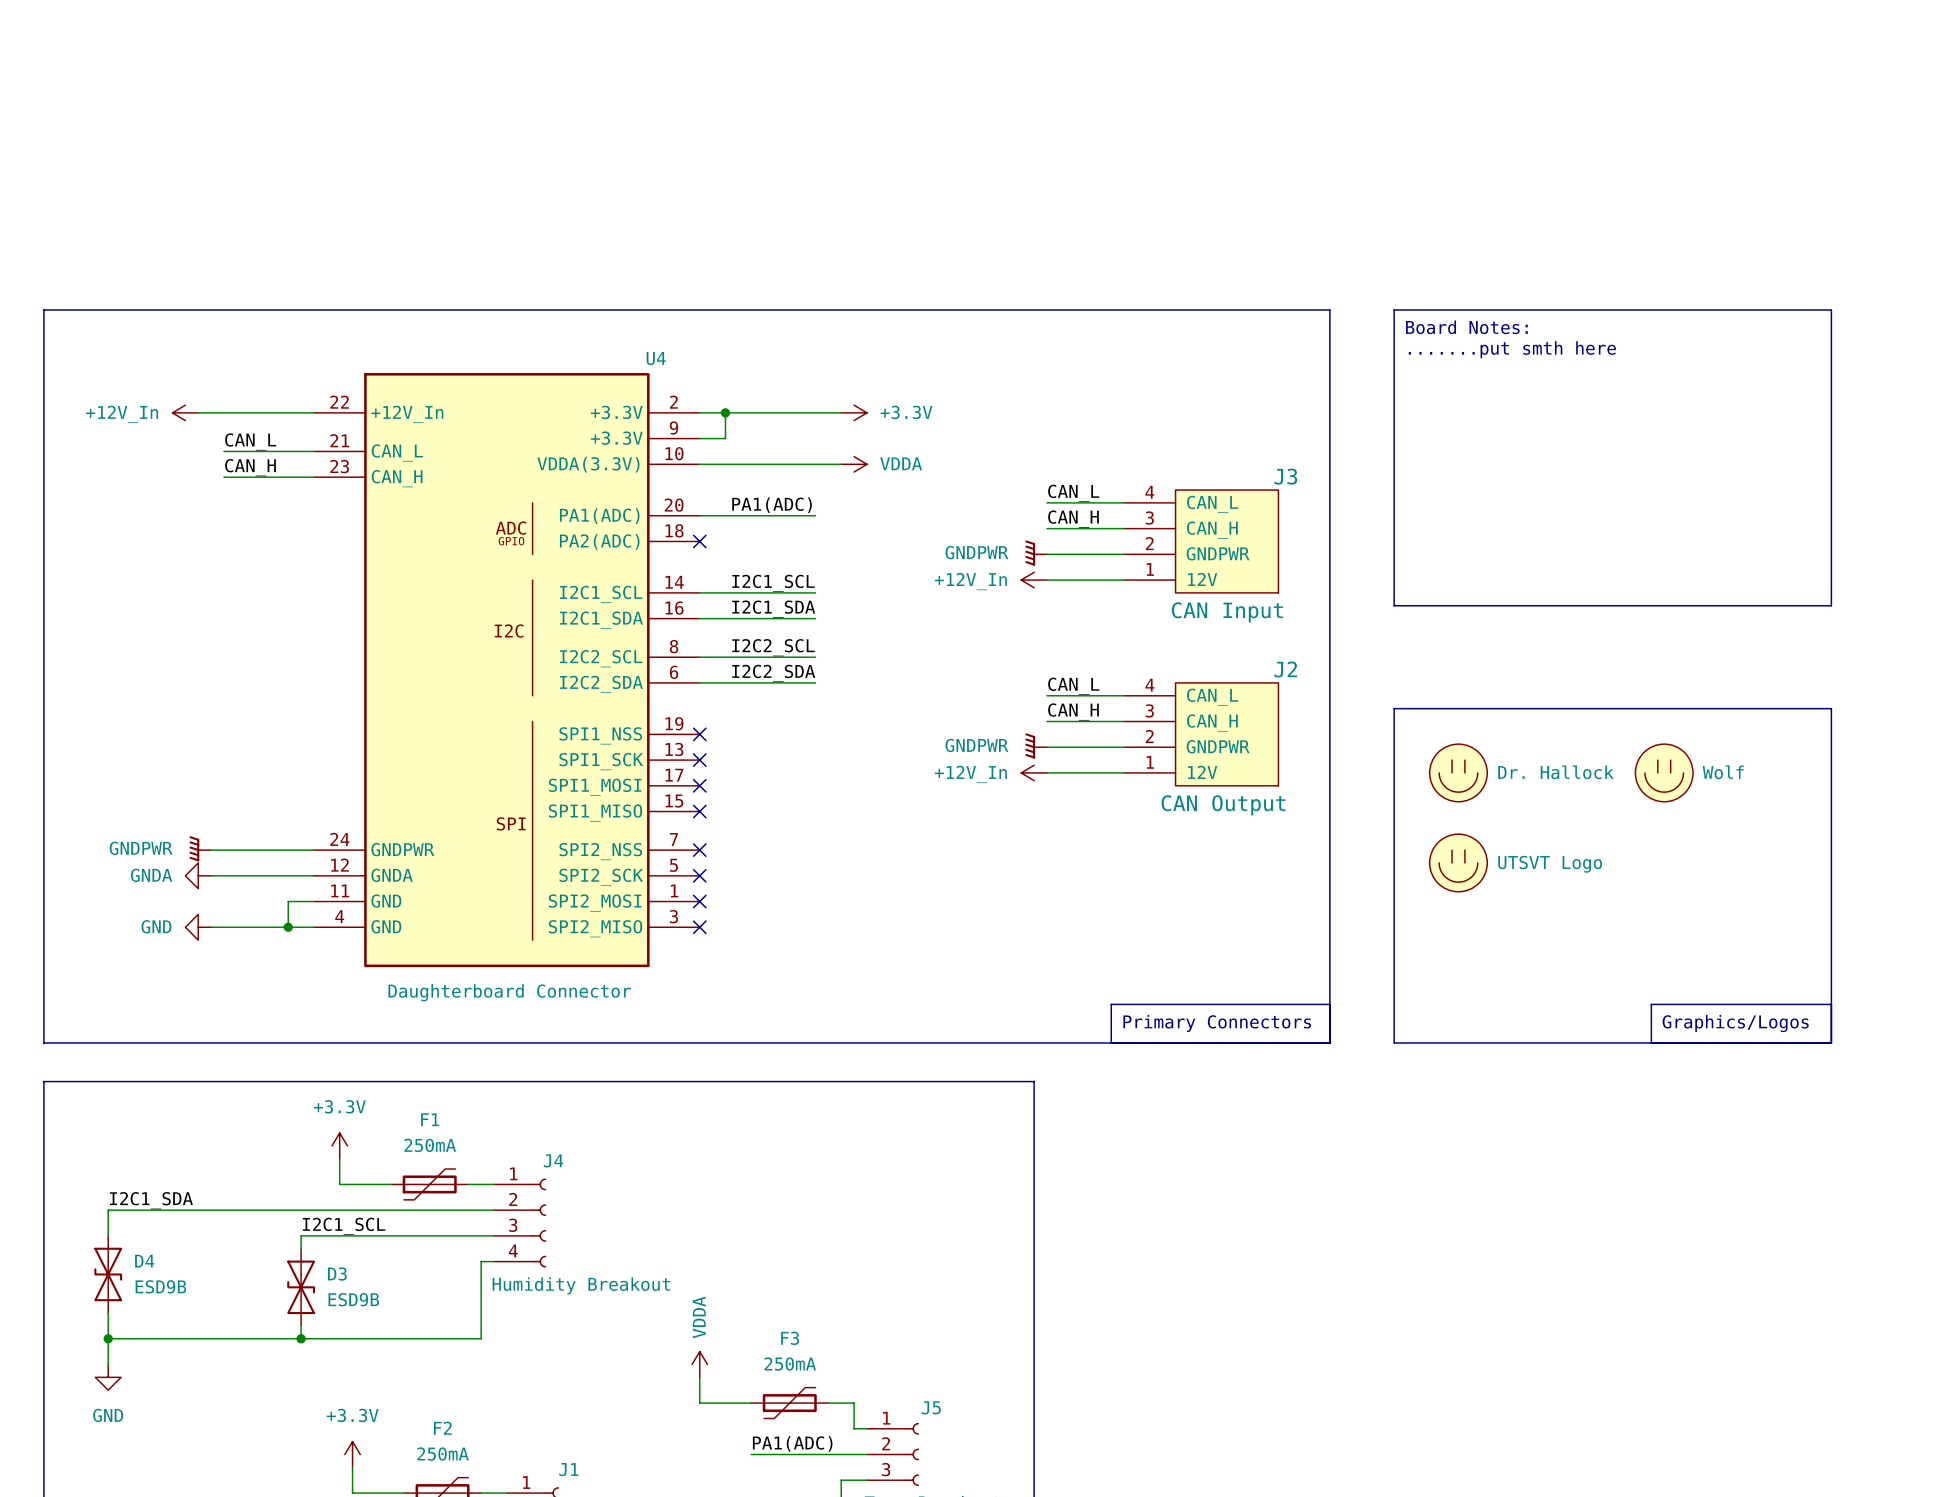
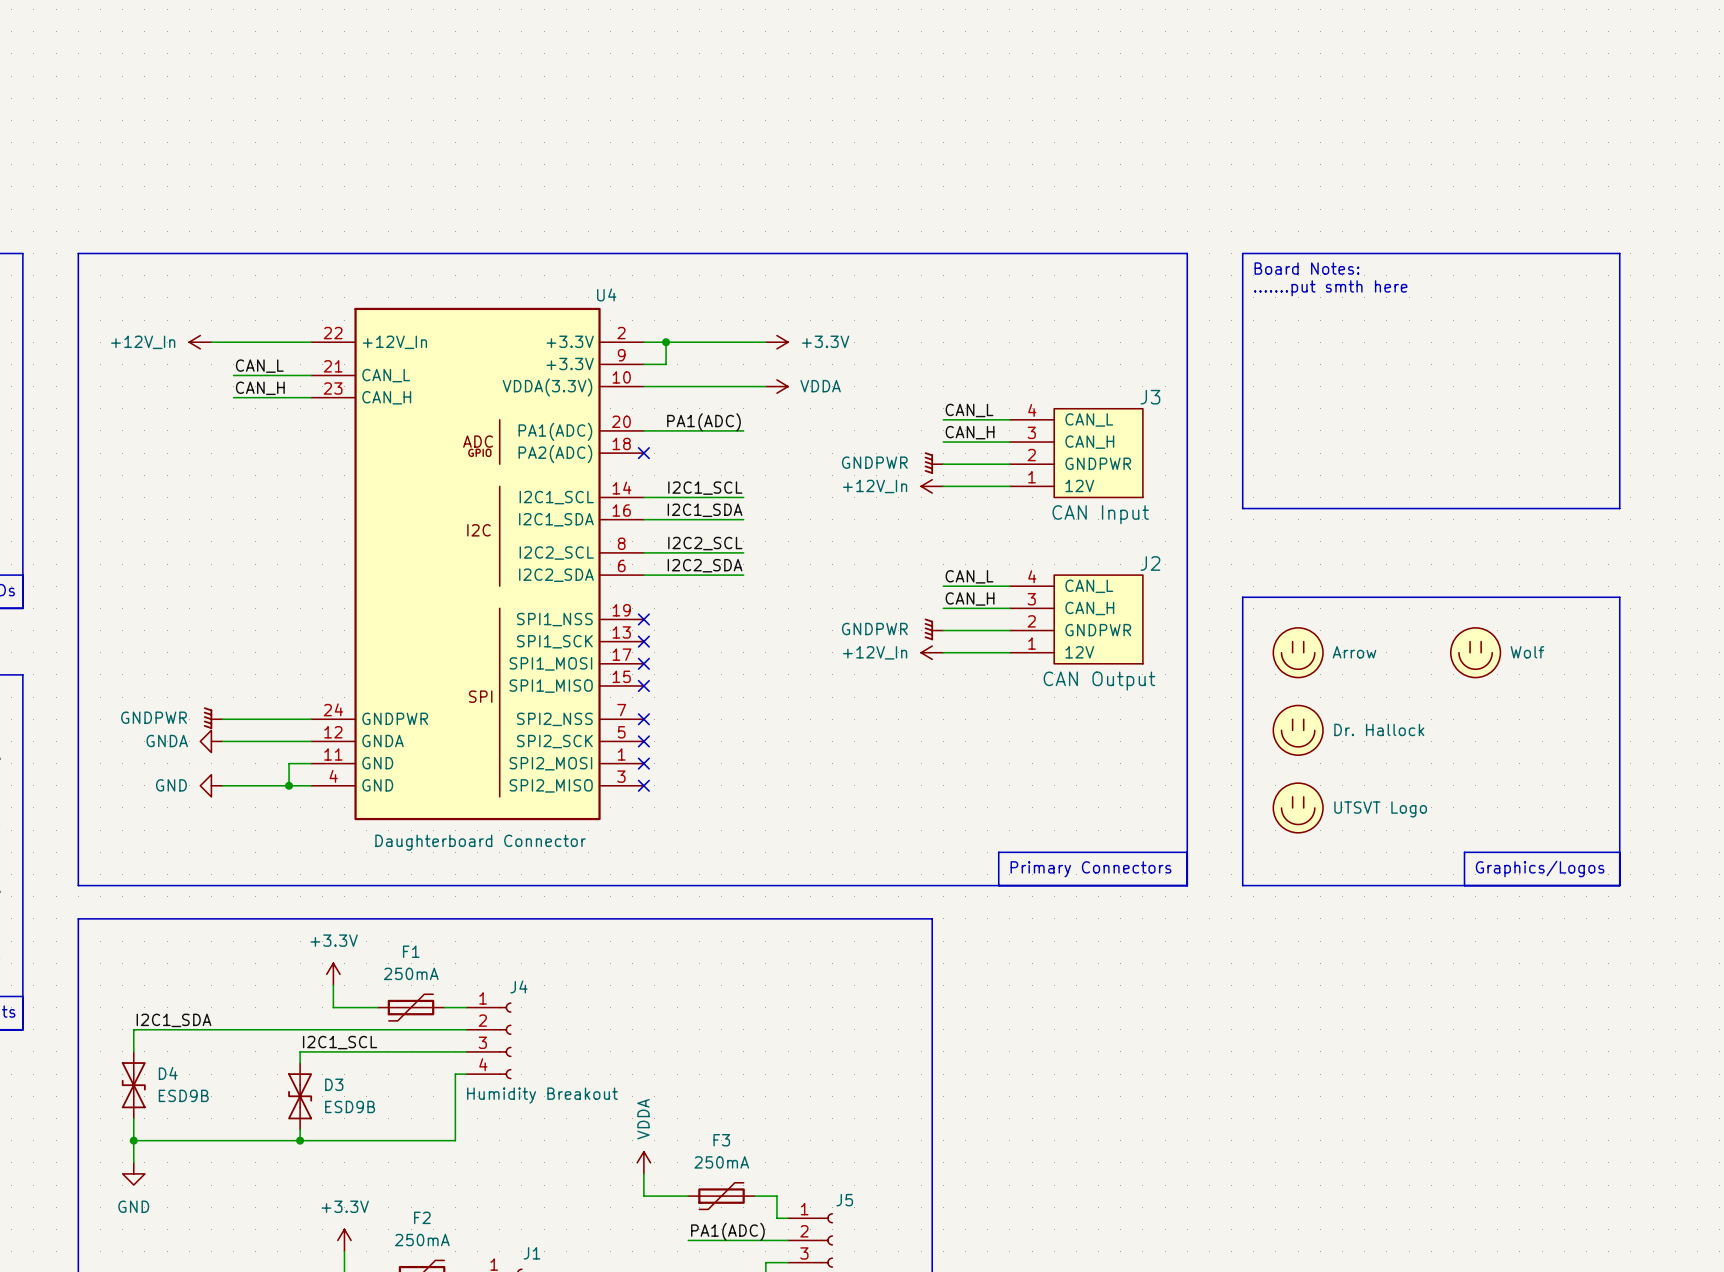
part value: Dr. Hallock (1555, 772) -> Arrow (1354, 652)
part value: UTSVT Logo (1550, 864) -> Dr. Hallock (1379, 729)
part: none -> UTSVT Logo (1298, 807)

